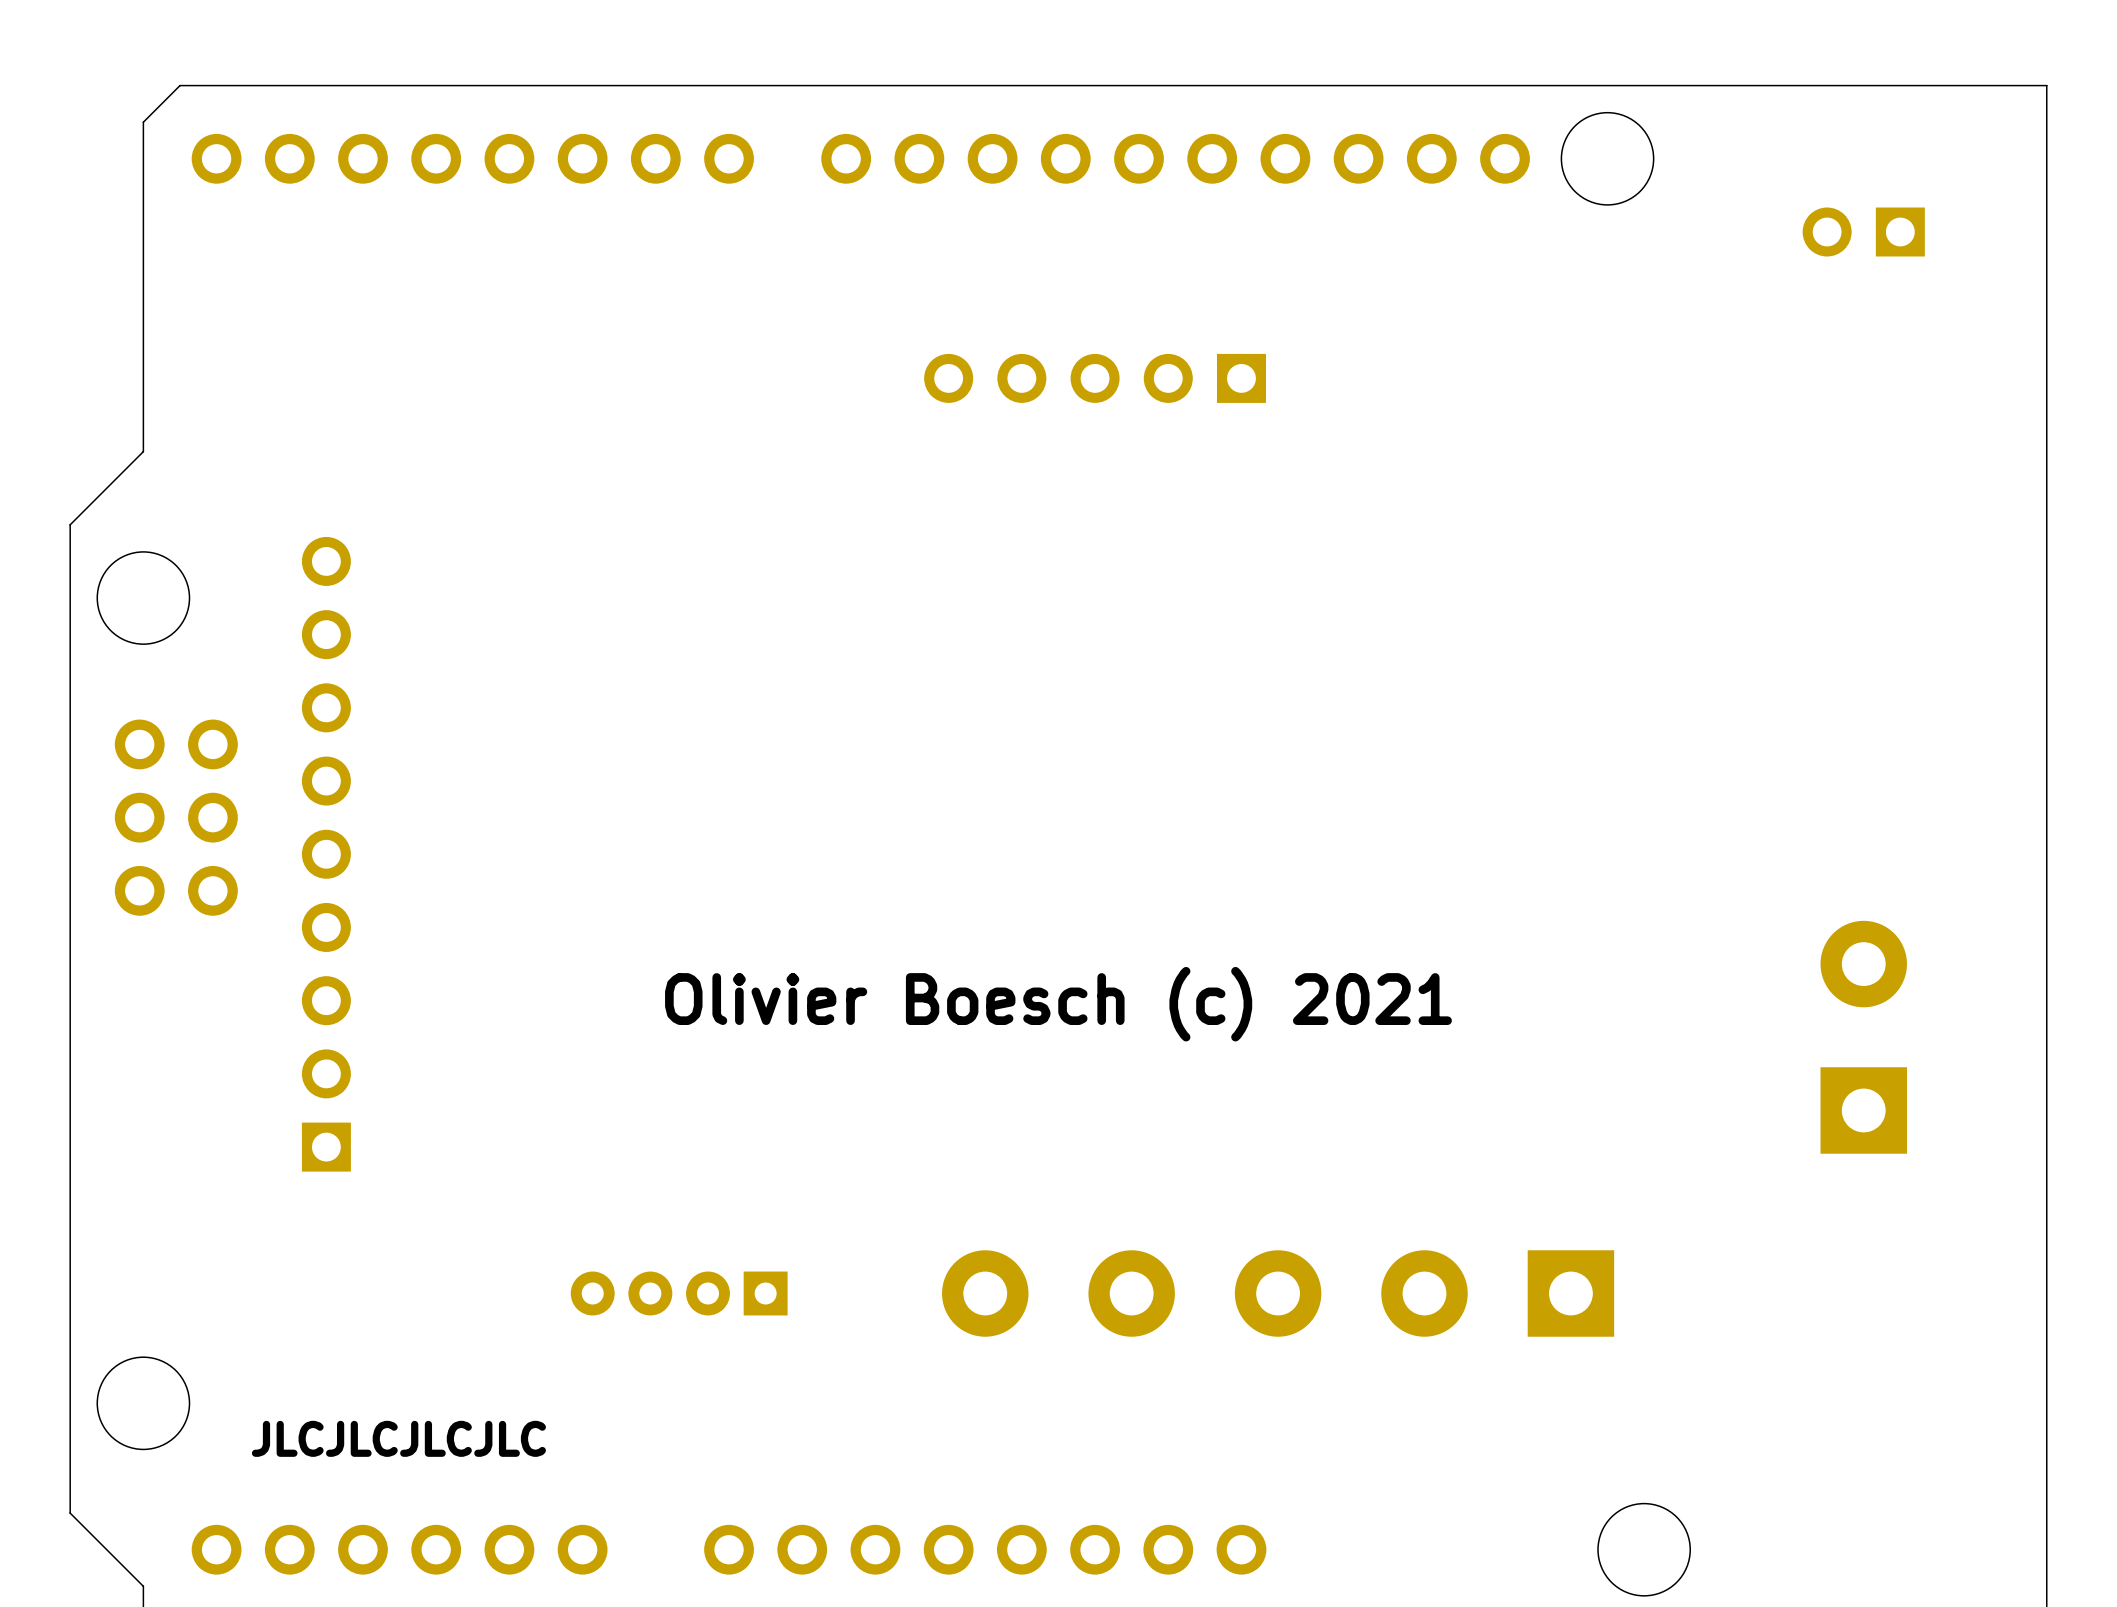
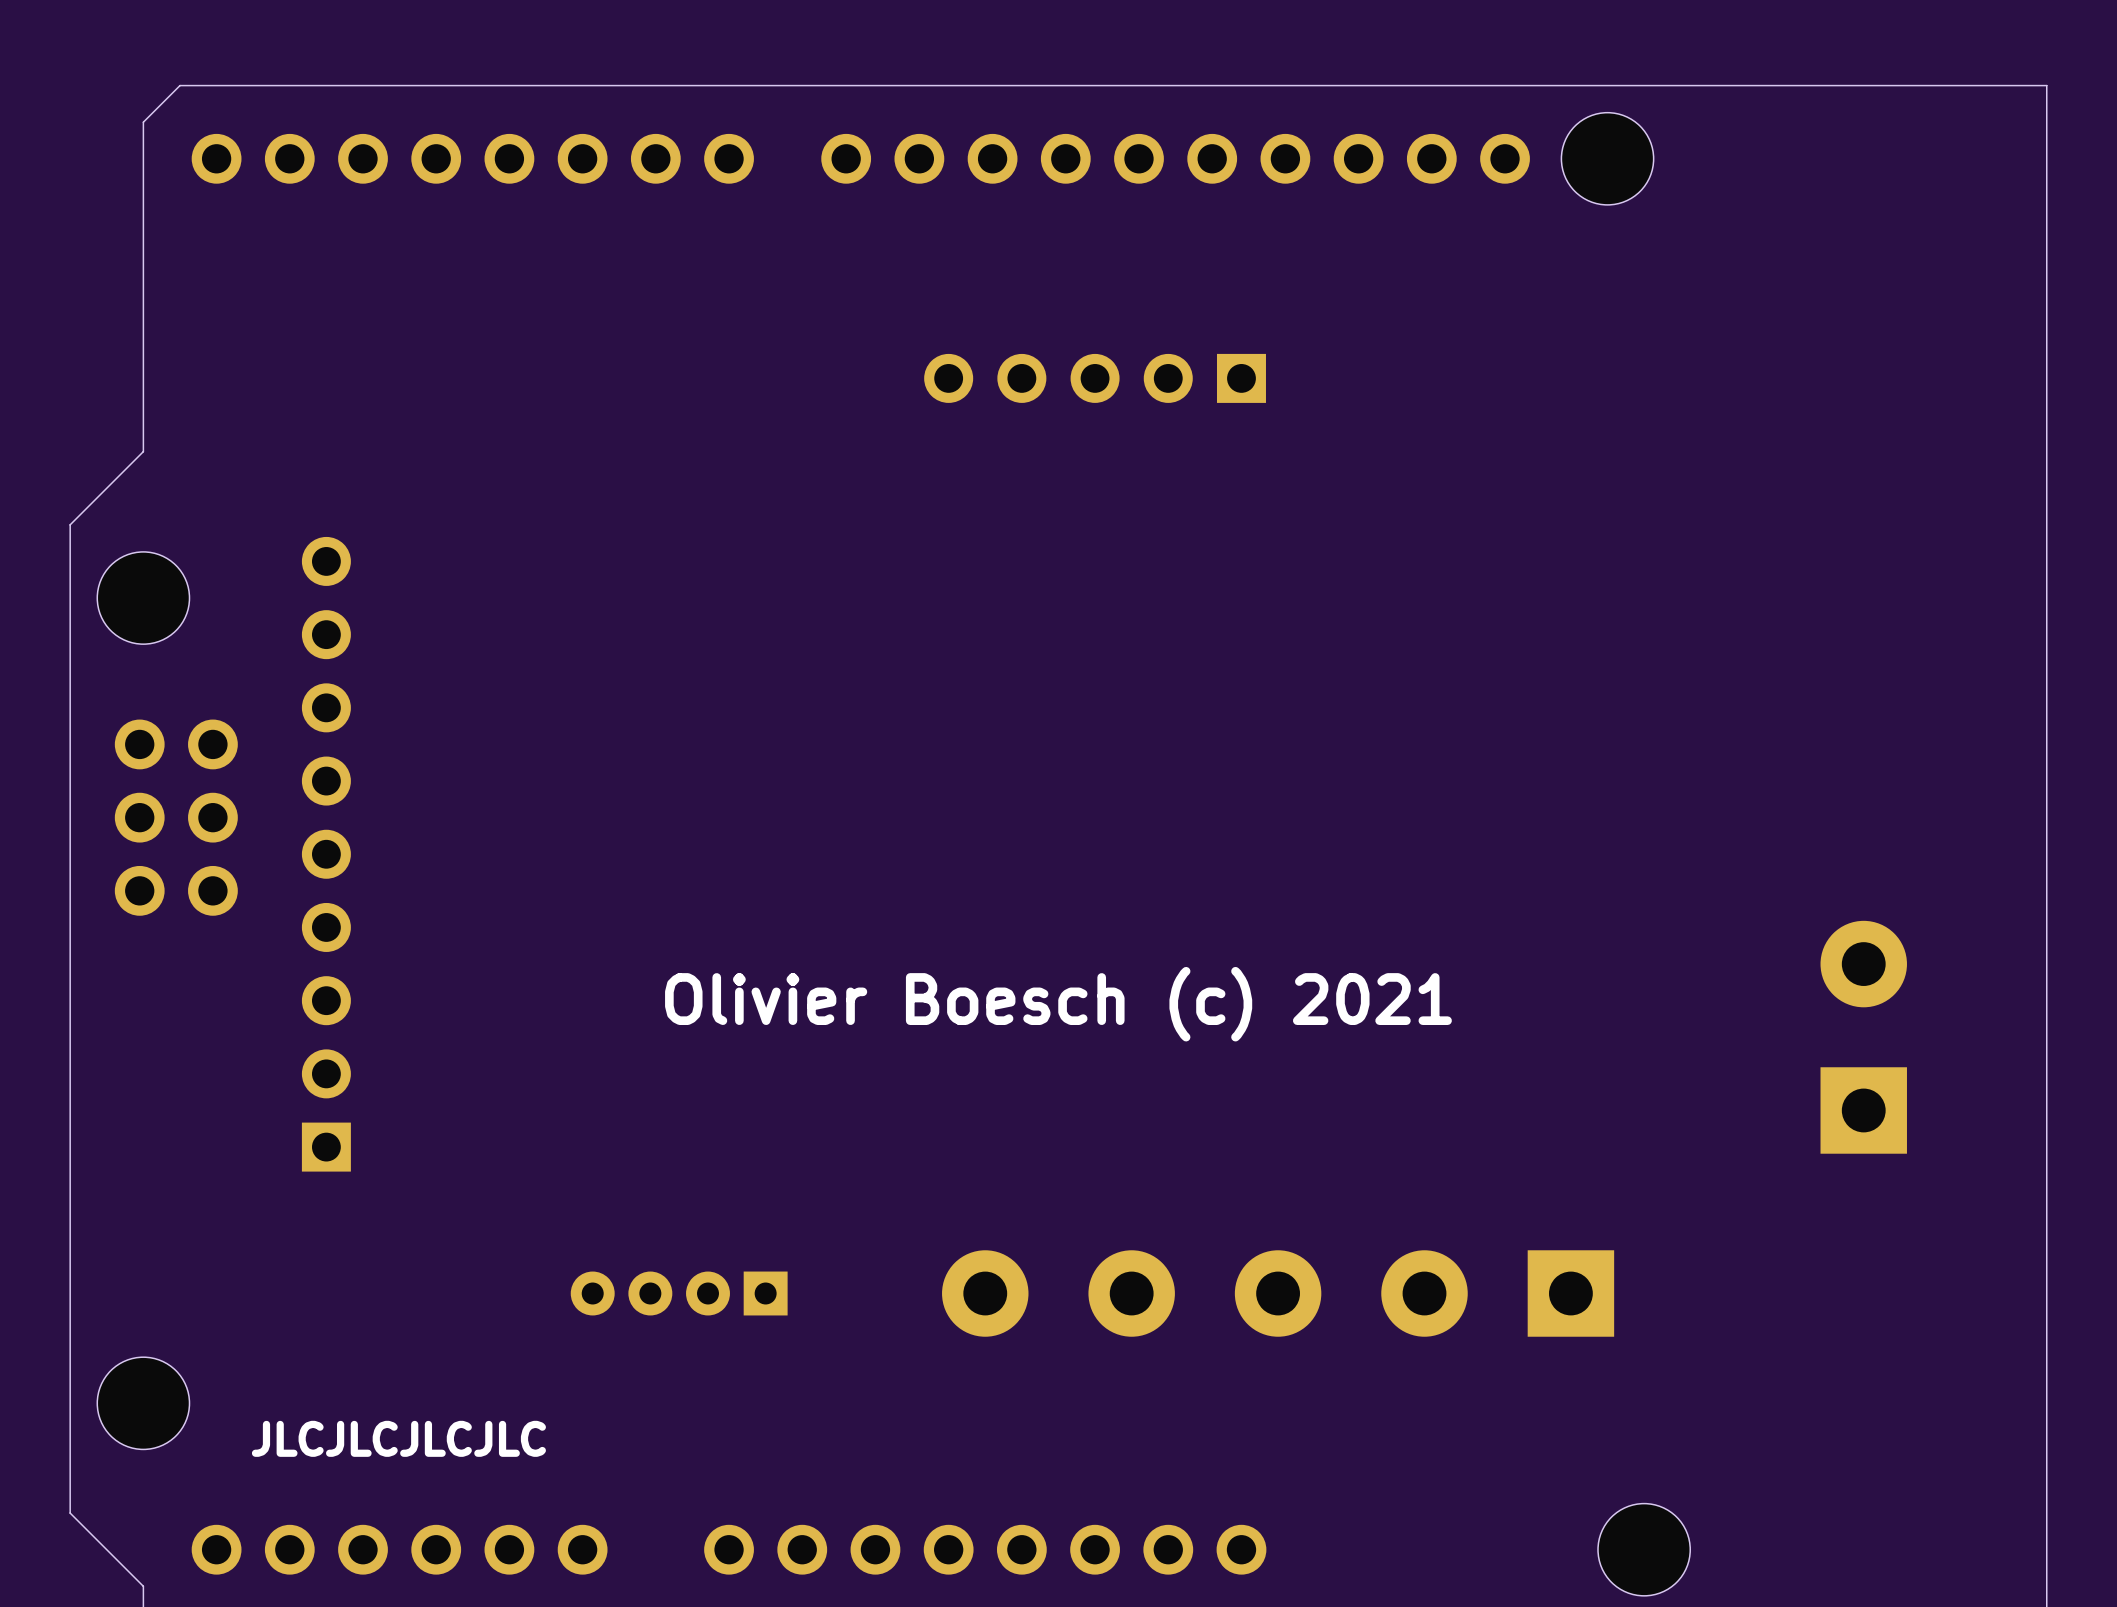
part: (1863, 232) -> none

